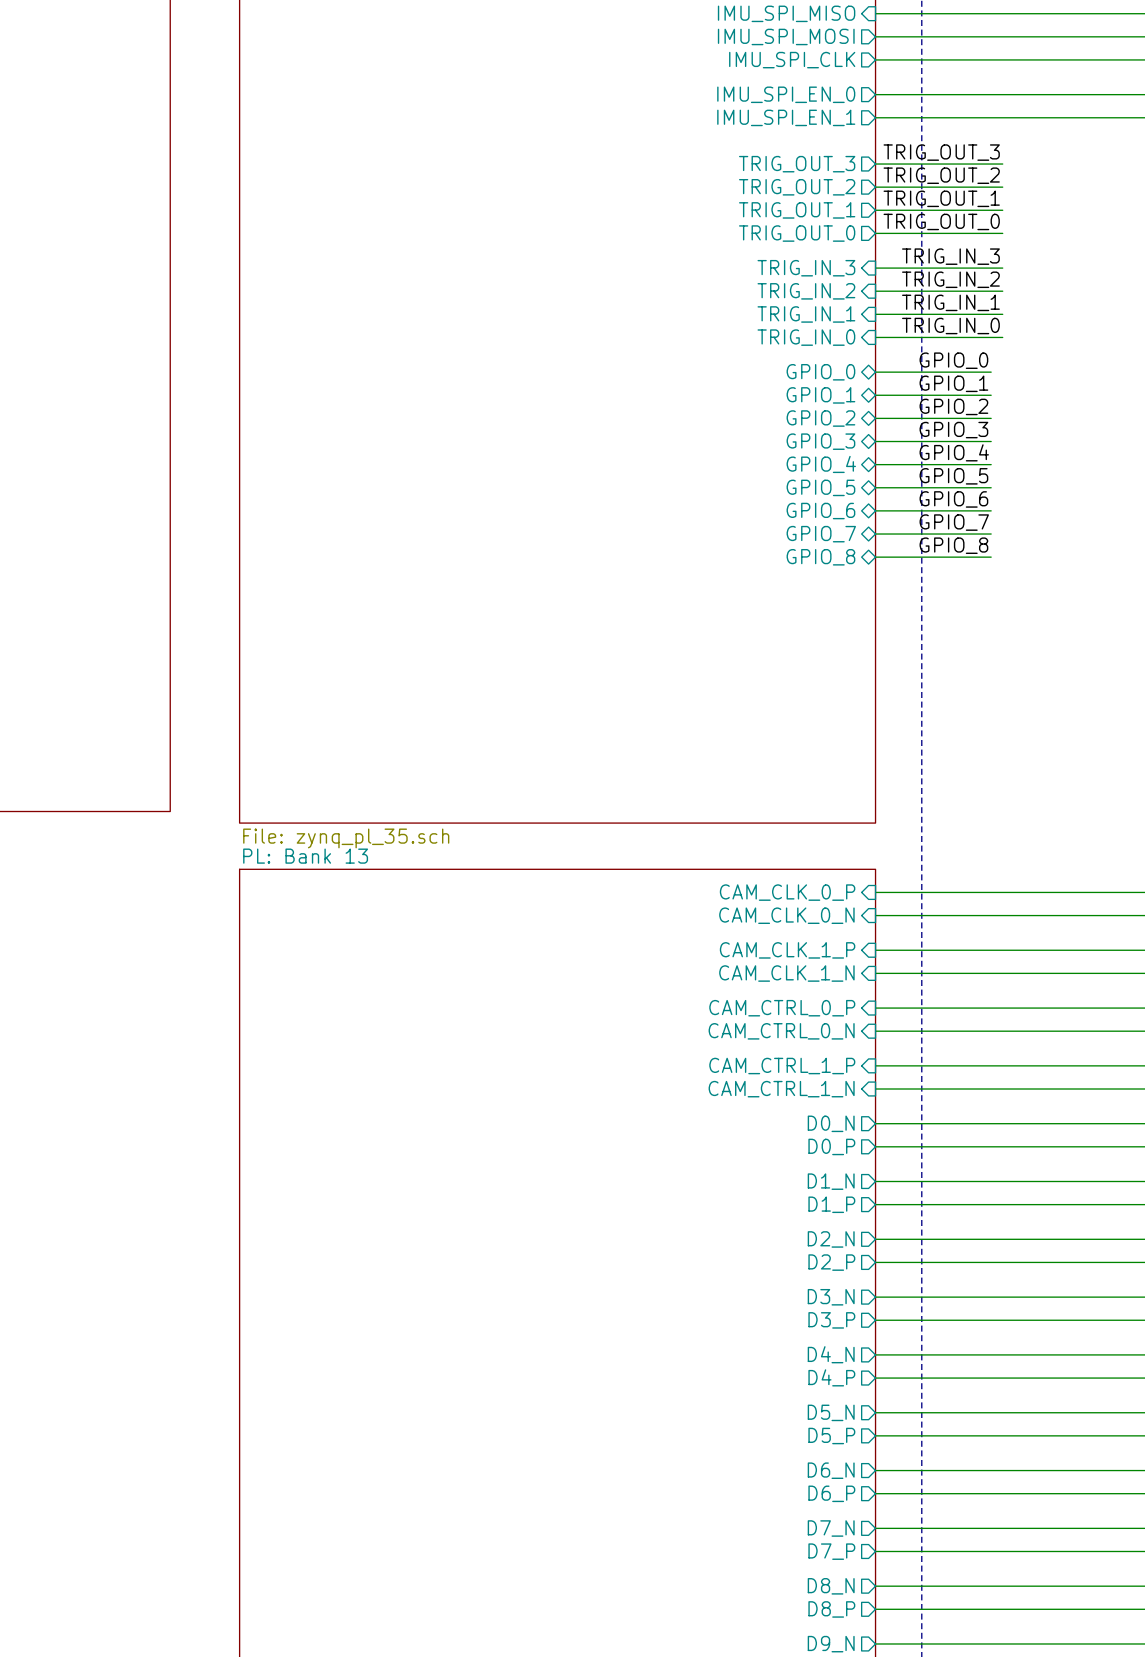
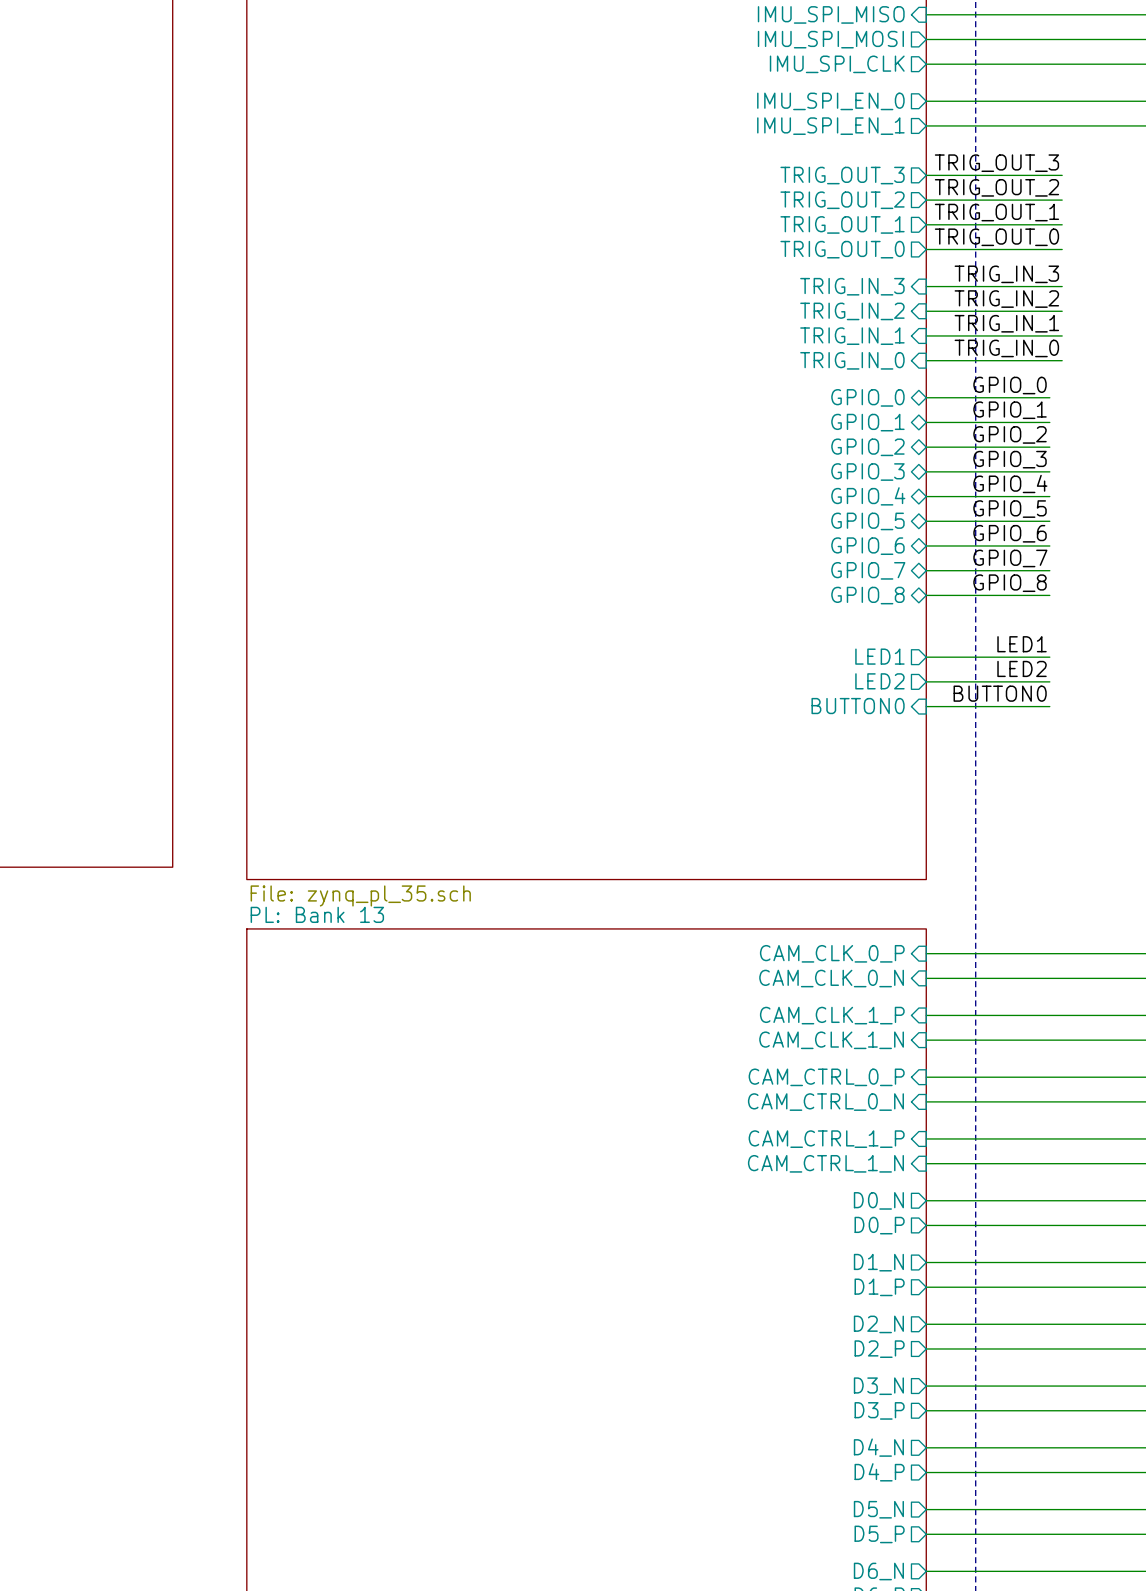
label: none -> LED1 (1022, 644)
sheet pin: none -> LED1 (879, 656)
wire: none -> (926, 657) (1049, 657)
label: none -> LED2 (1022, 668)
sheet pin: none -> LED2 (879, 681)
wire: none -> (926, 681) (1049, 681)
label: none -> BUTTON0 (1000, 693)
sheet pin: none -> BUTTON0 (858, 706)
wire: none -> (926, 706) (1049, 706)

